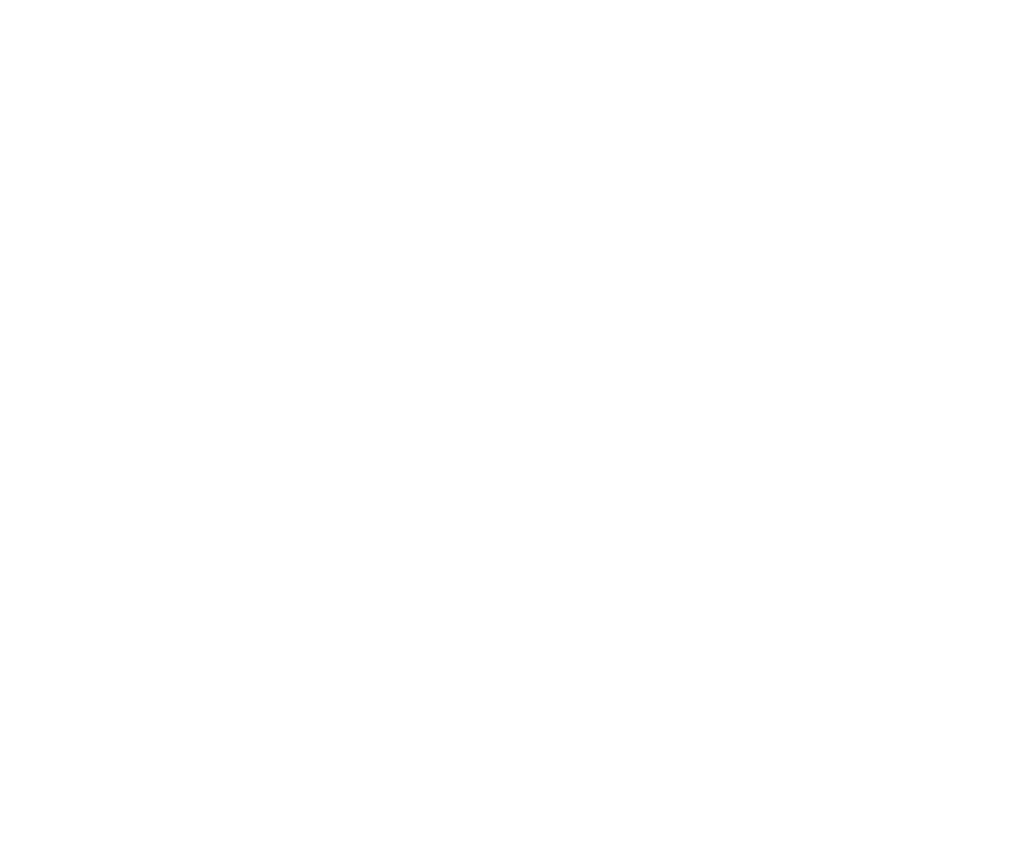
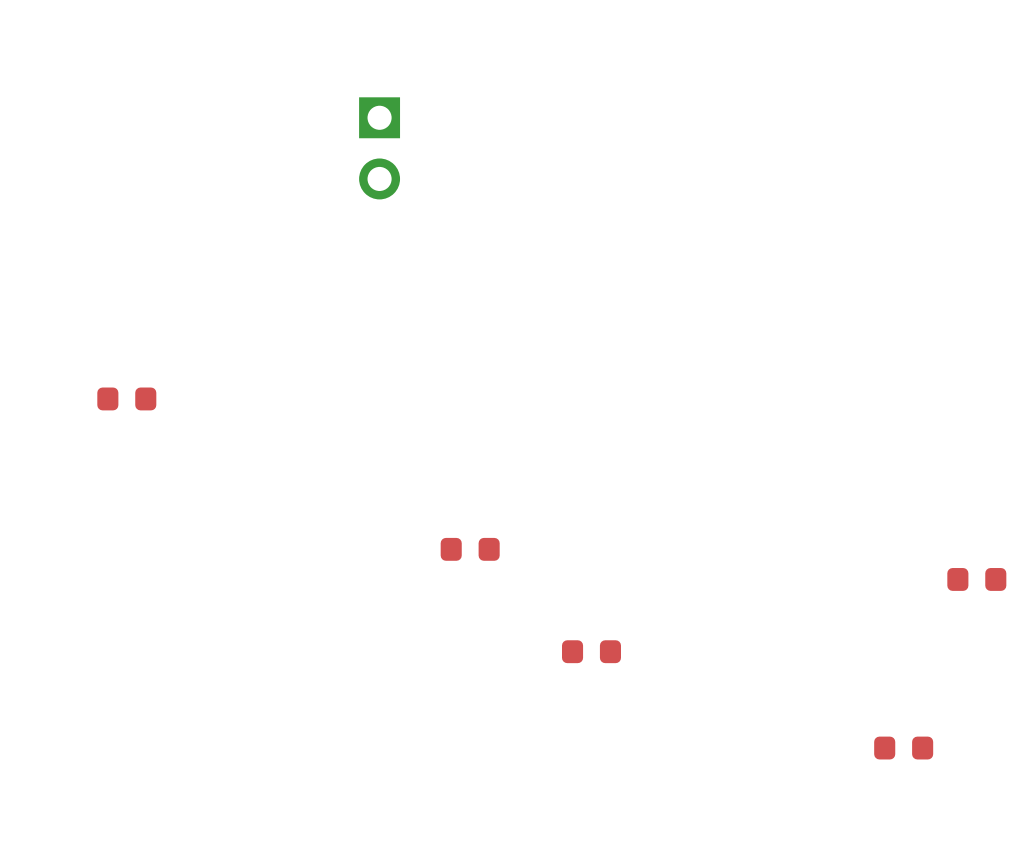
part: none -> (379, 148)
part: none -> (126, 398)
part: none -> (470, 549)
part: none -> (976, 579)
part: none -> (591, 651)
part: none -> (903, 748)

